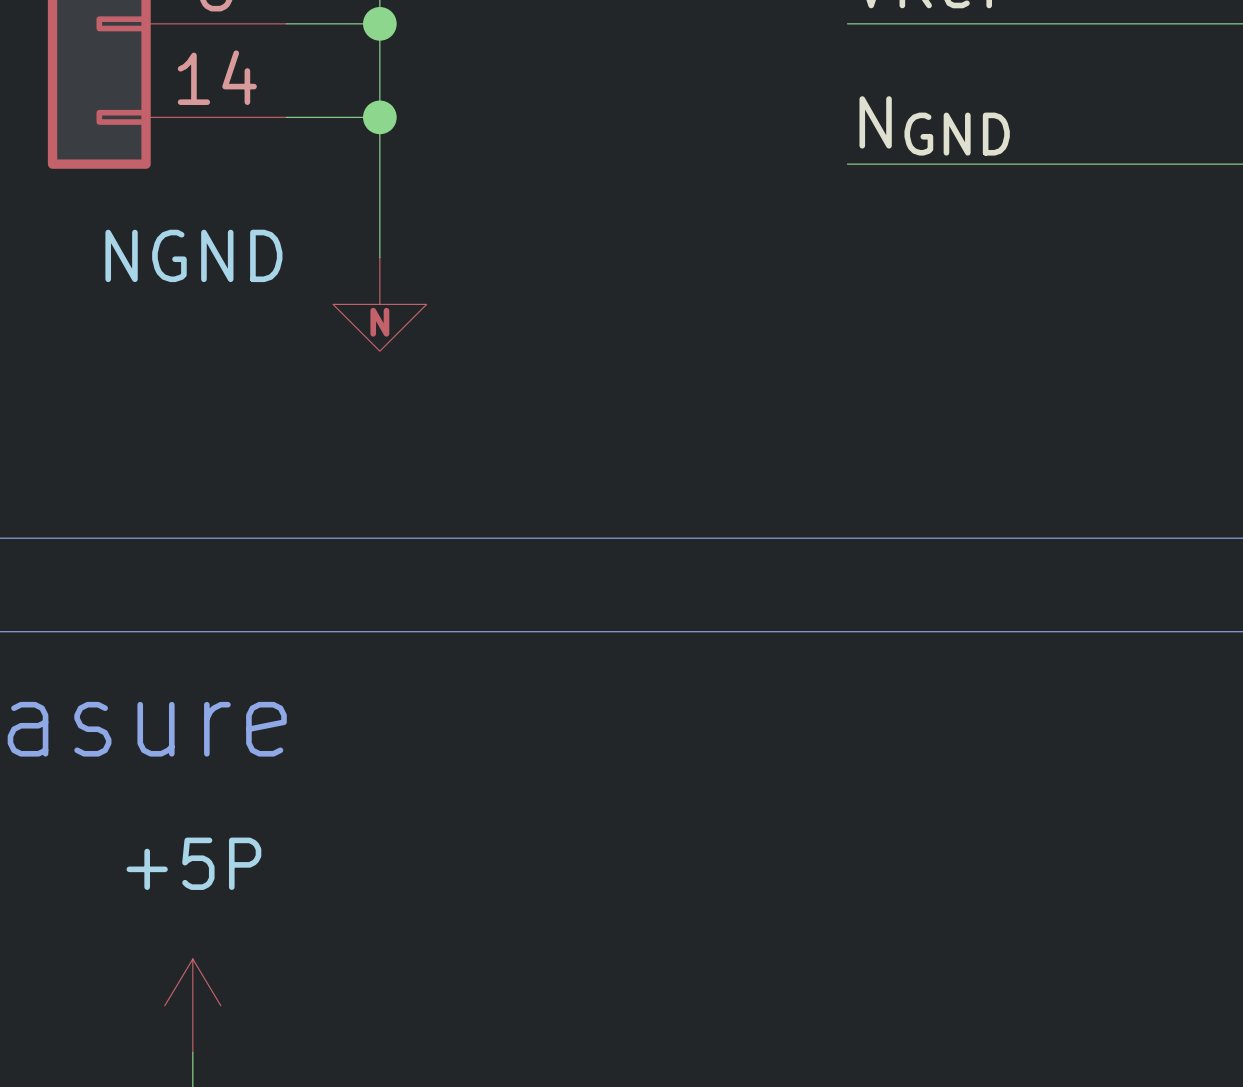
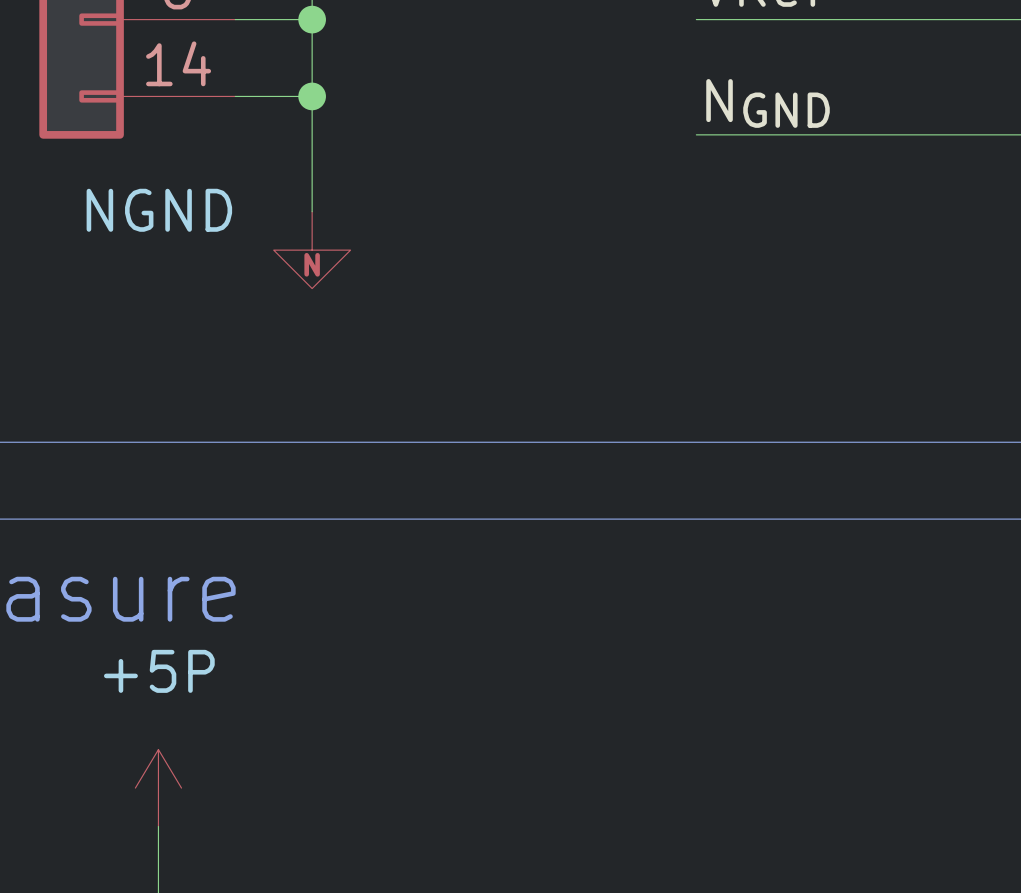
power symbol position: +5P (192, 1005) -> +5P (158, 788)

